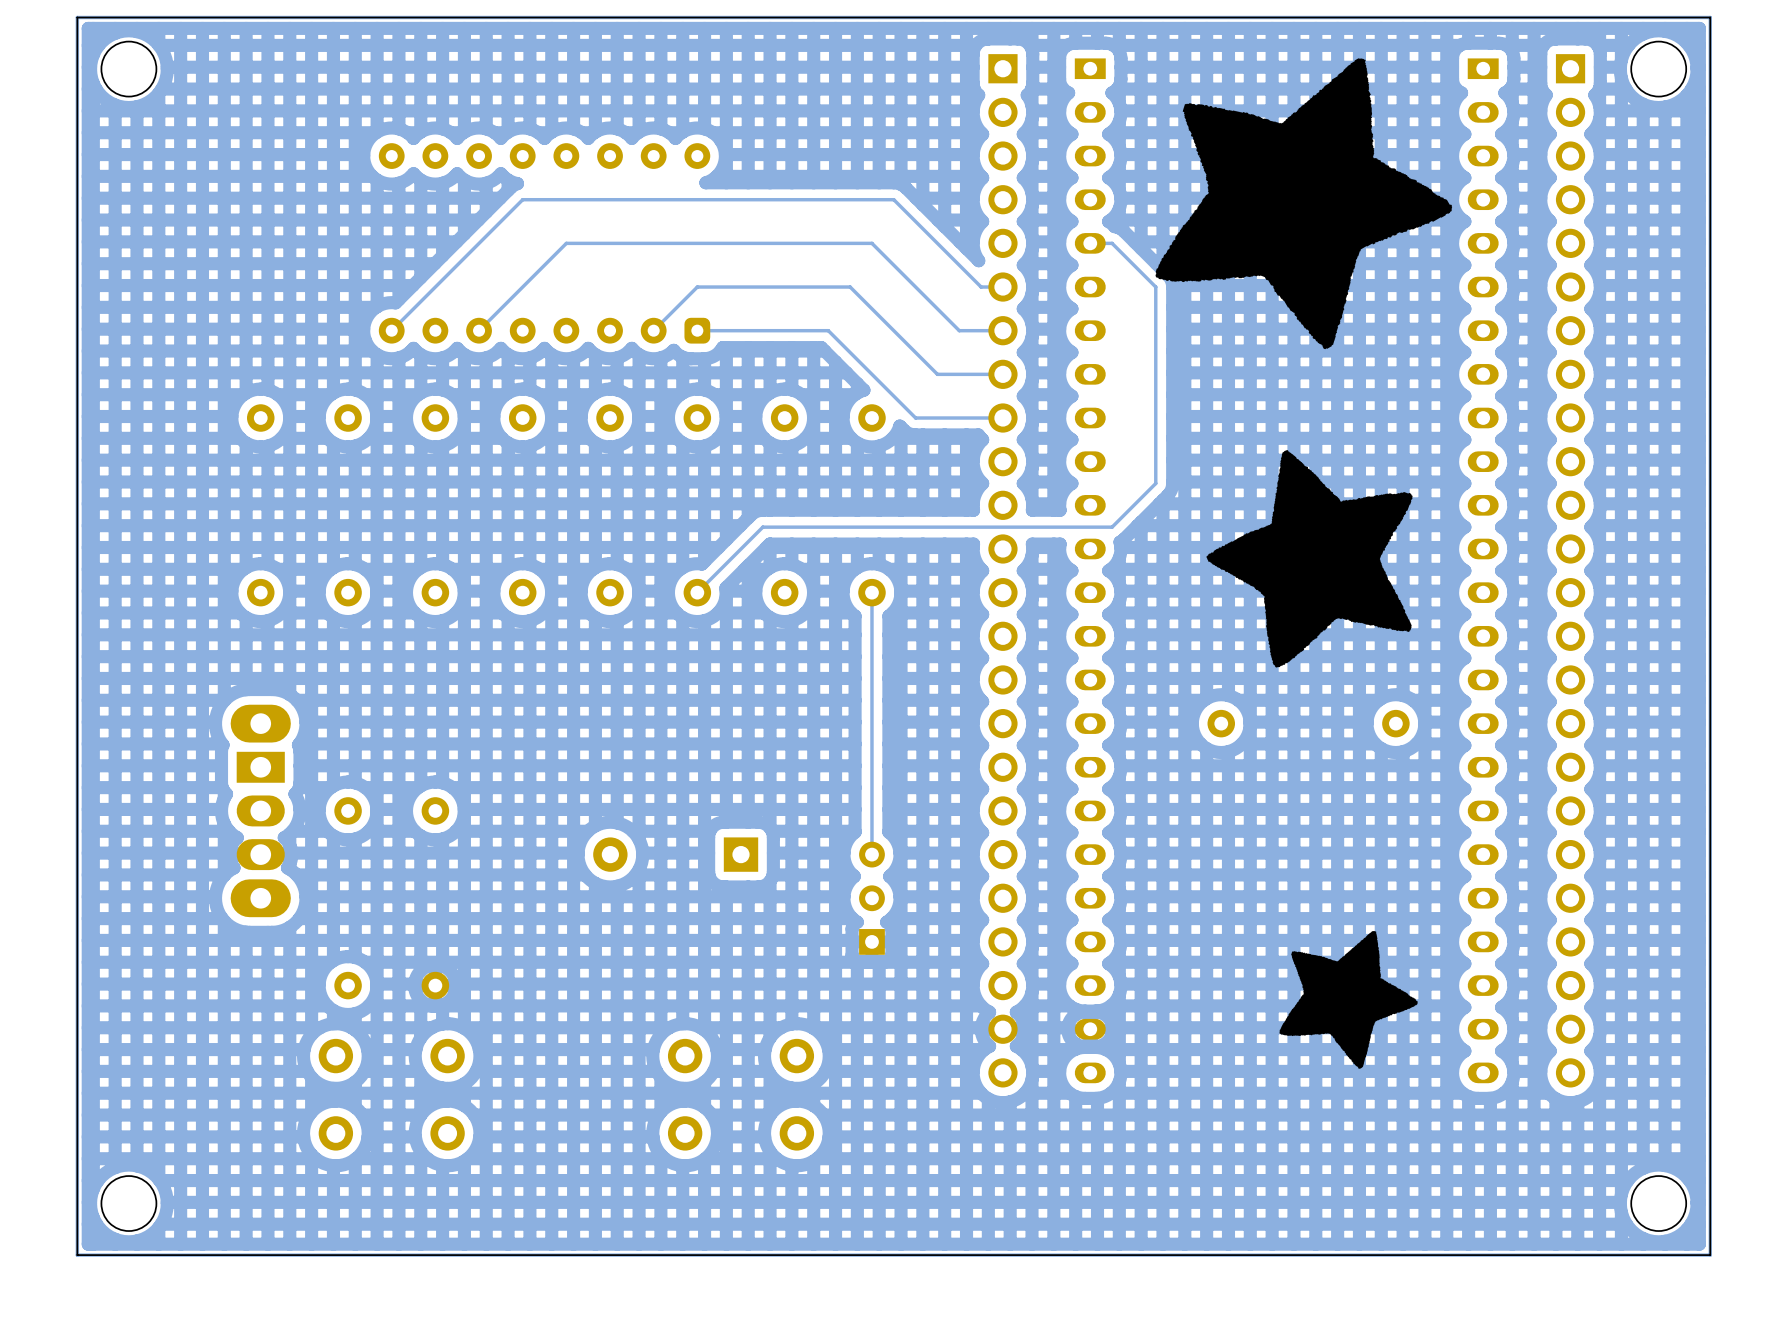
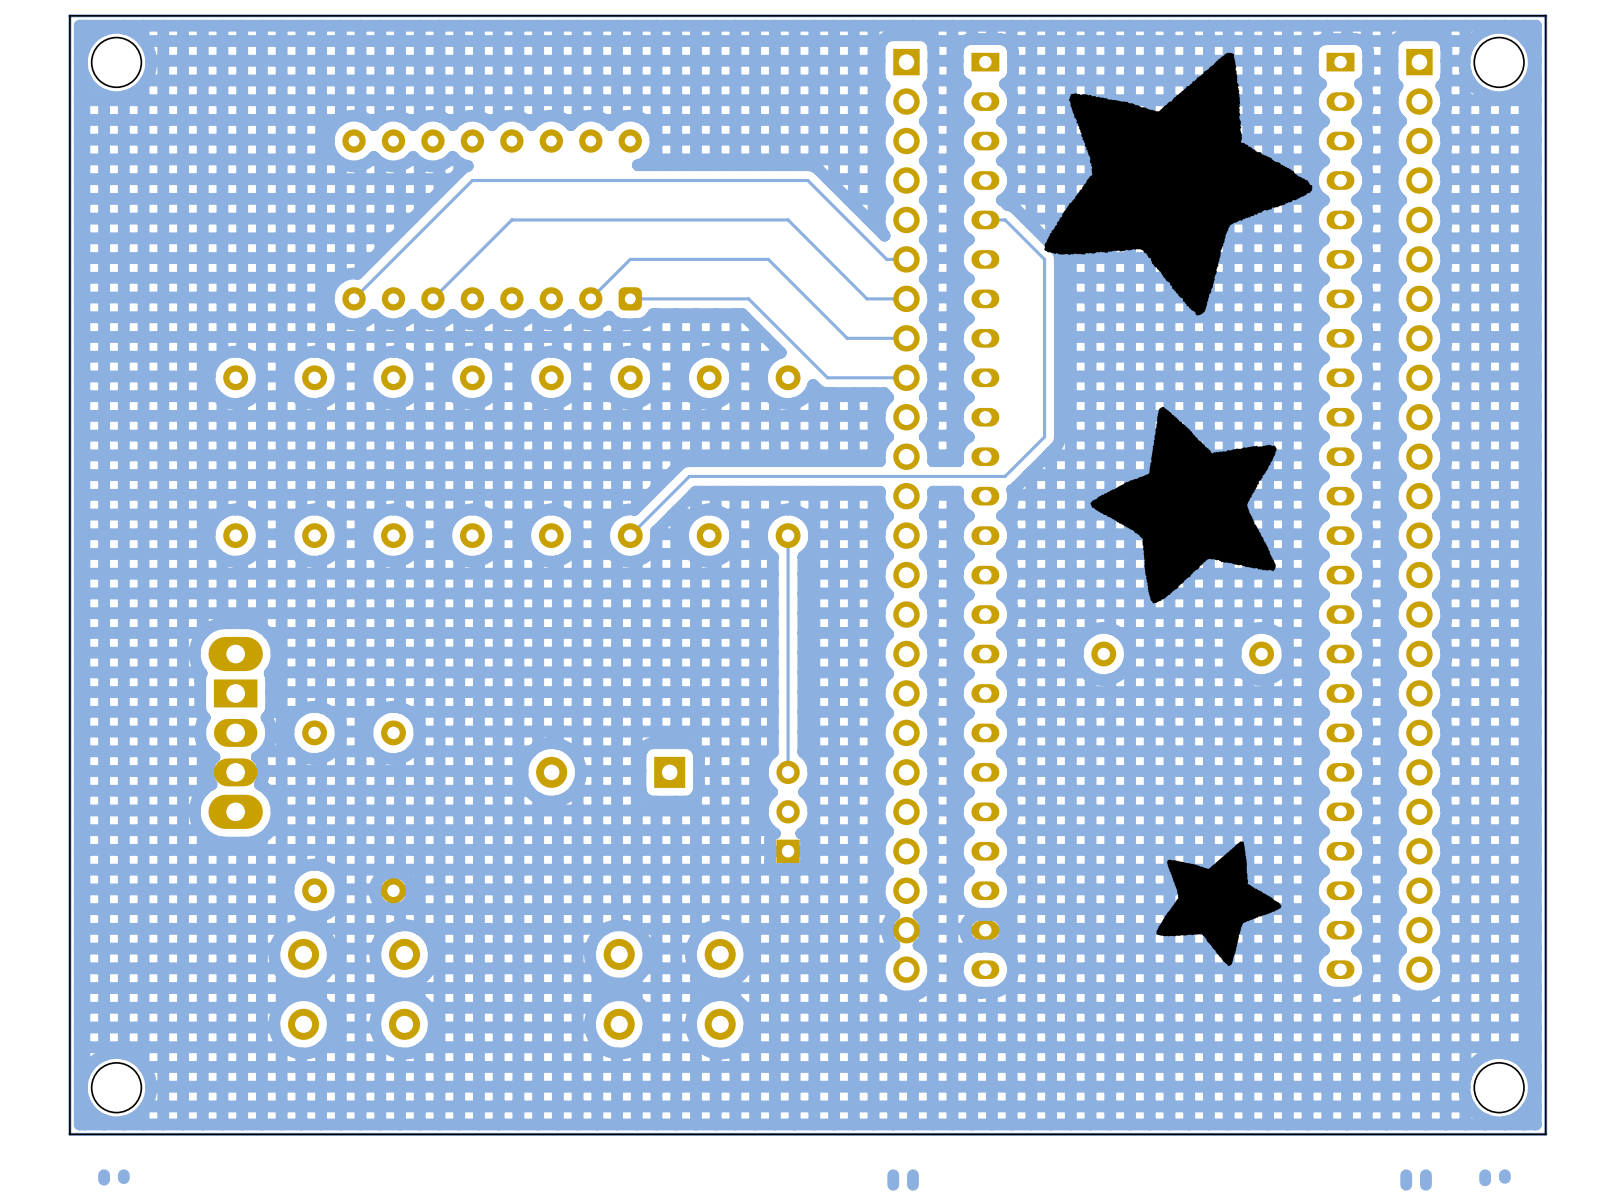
track: none -> (104, 1175) (104, 1179)
track: none -> (123, 1175) (123, 1178)
track: none -> (893, 1175) (893, 1184)
track: none -> (912, 1175) (912, 1184)
track: none -> (1406, 1175) (1406, 1184)
track: none -> (1425, 1175) (1425, 1184)
track: none -> (1485, 1175) (1485, 1180)
track: none -> (1504, 1175) (1504, 1177)

